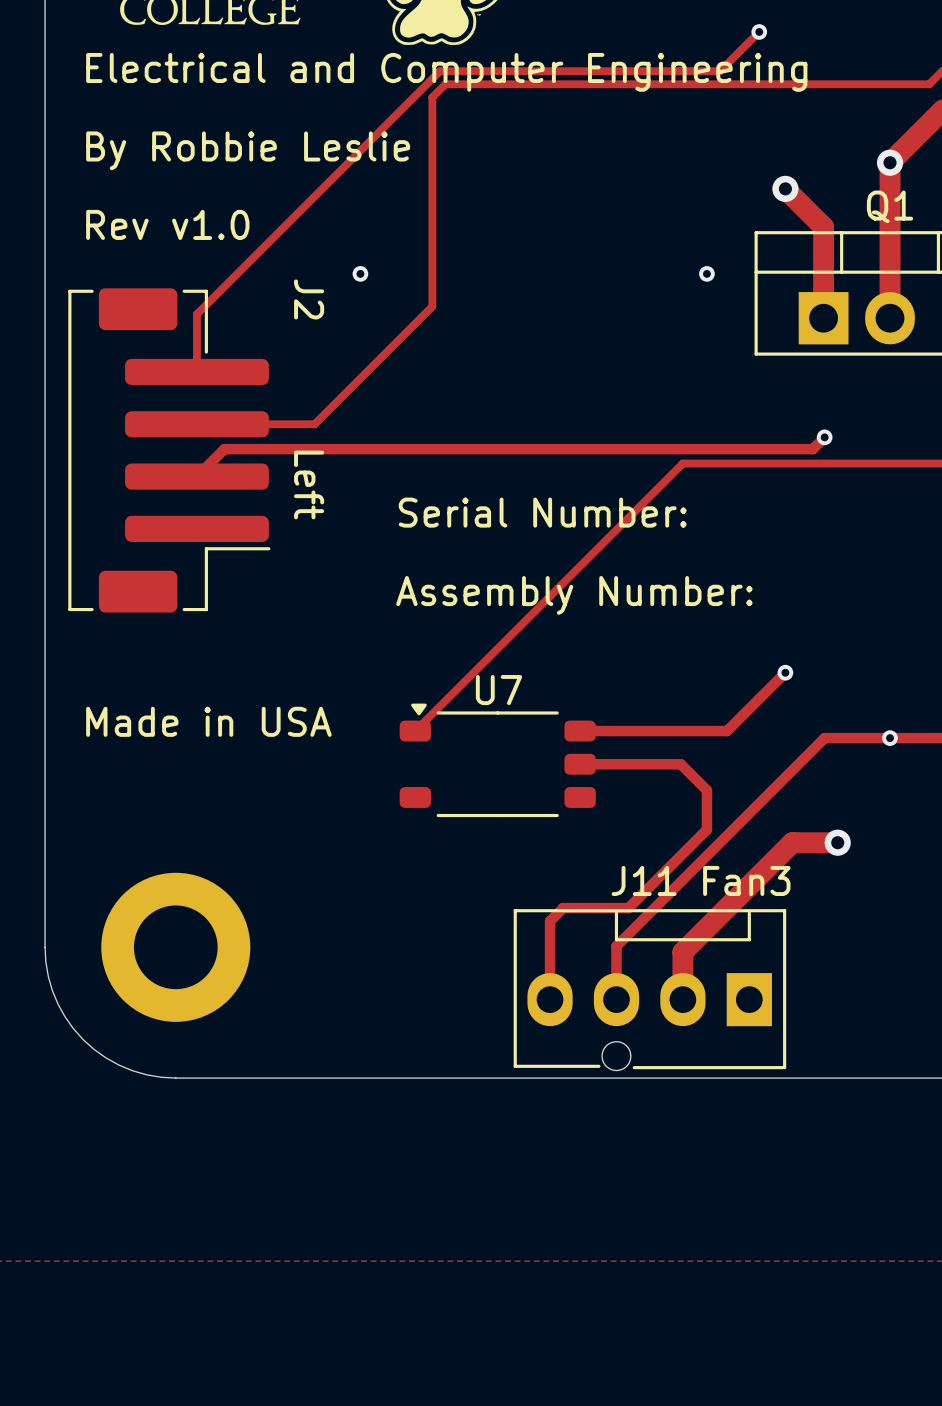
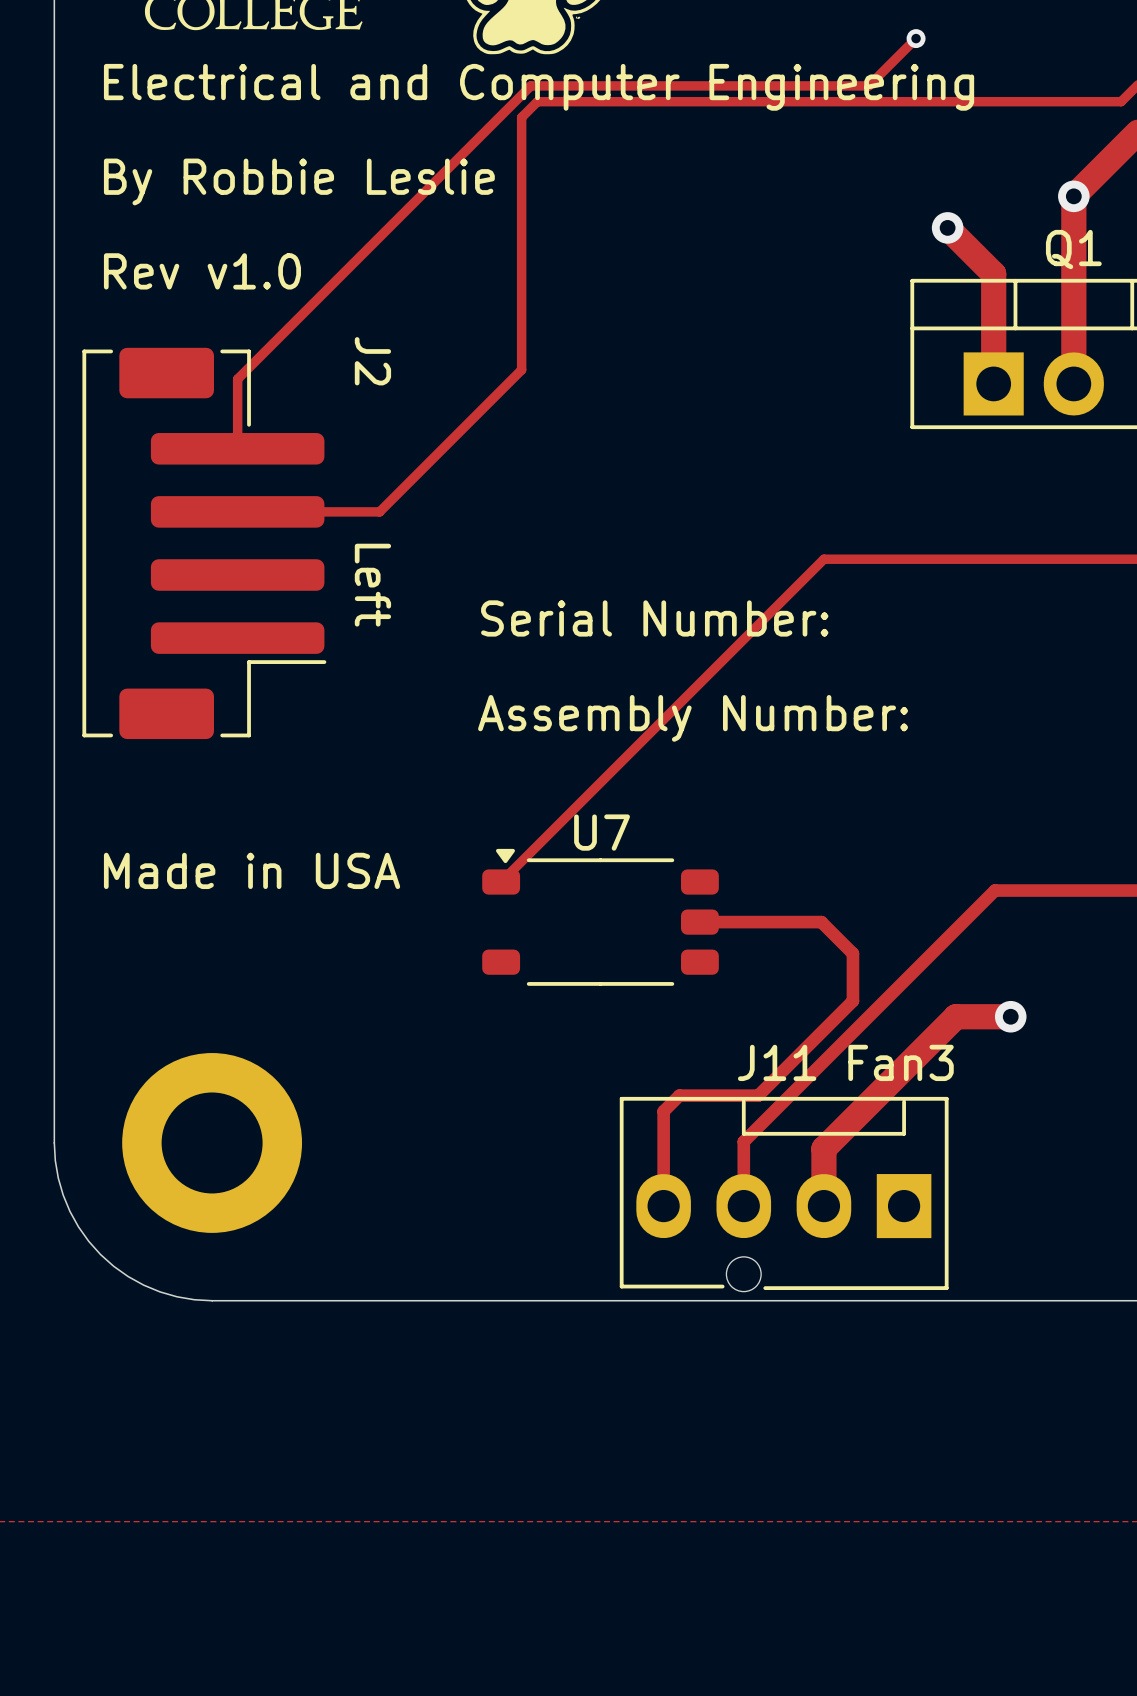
via: (360, 273) -> none
via: (706, 273) -> none
track: (824, 437) (812, 449) (224, 449) (196, 476) -> none
via: (824, 437) -> none
track: (785, 672) (727, 731) (580, 731) -> none
via: (785, 672) -> none
via: (890, 738) -> none

